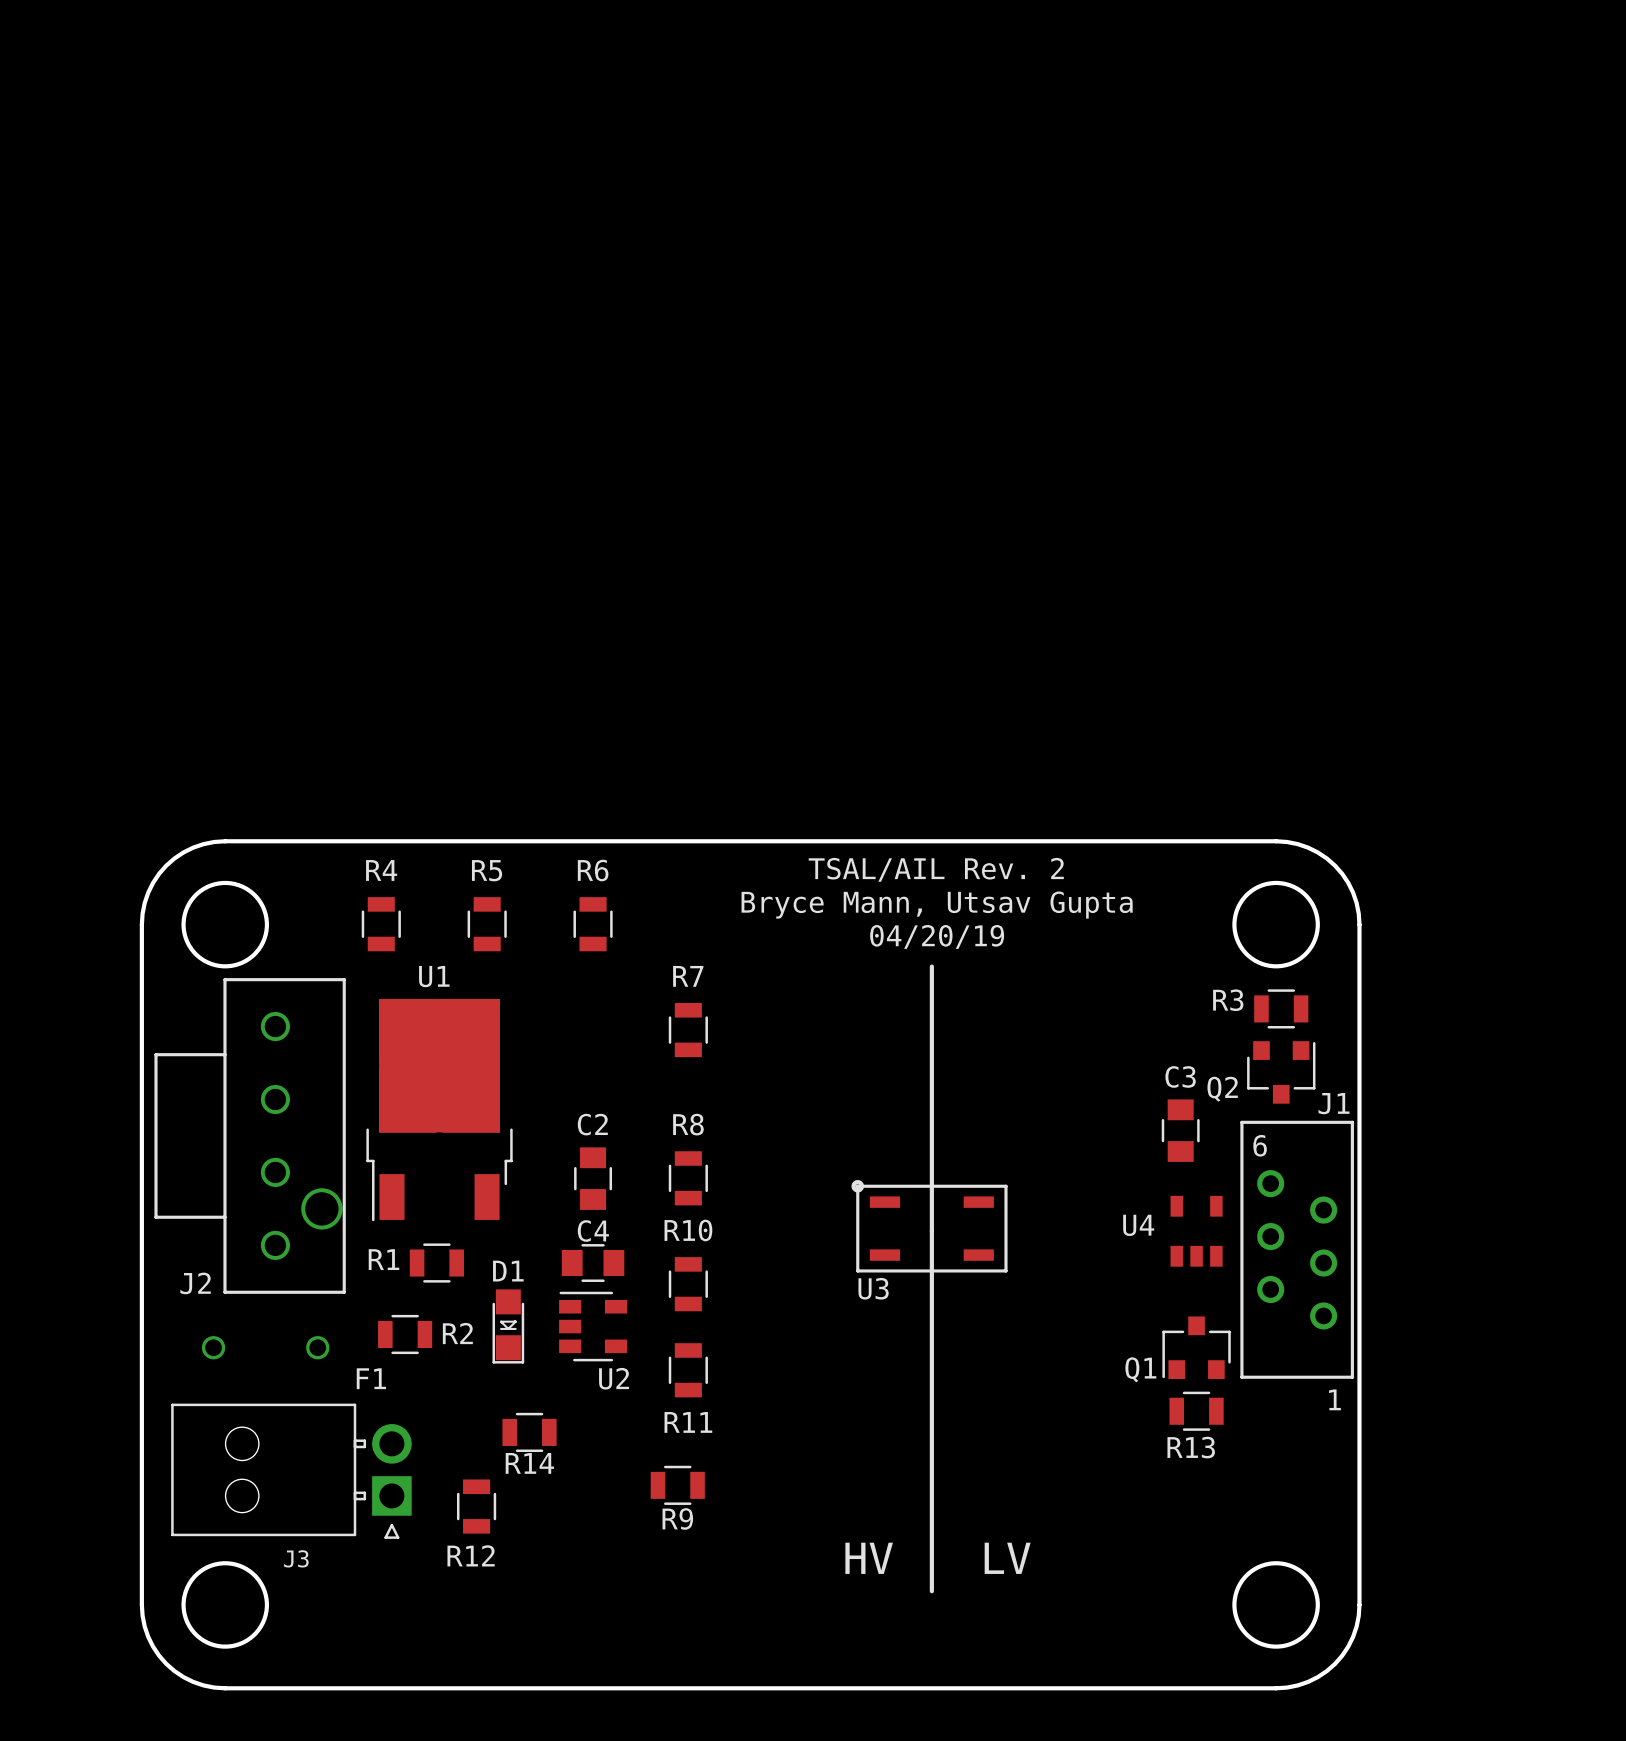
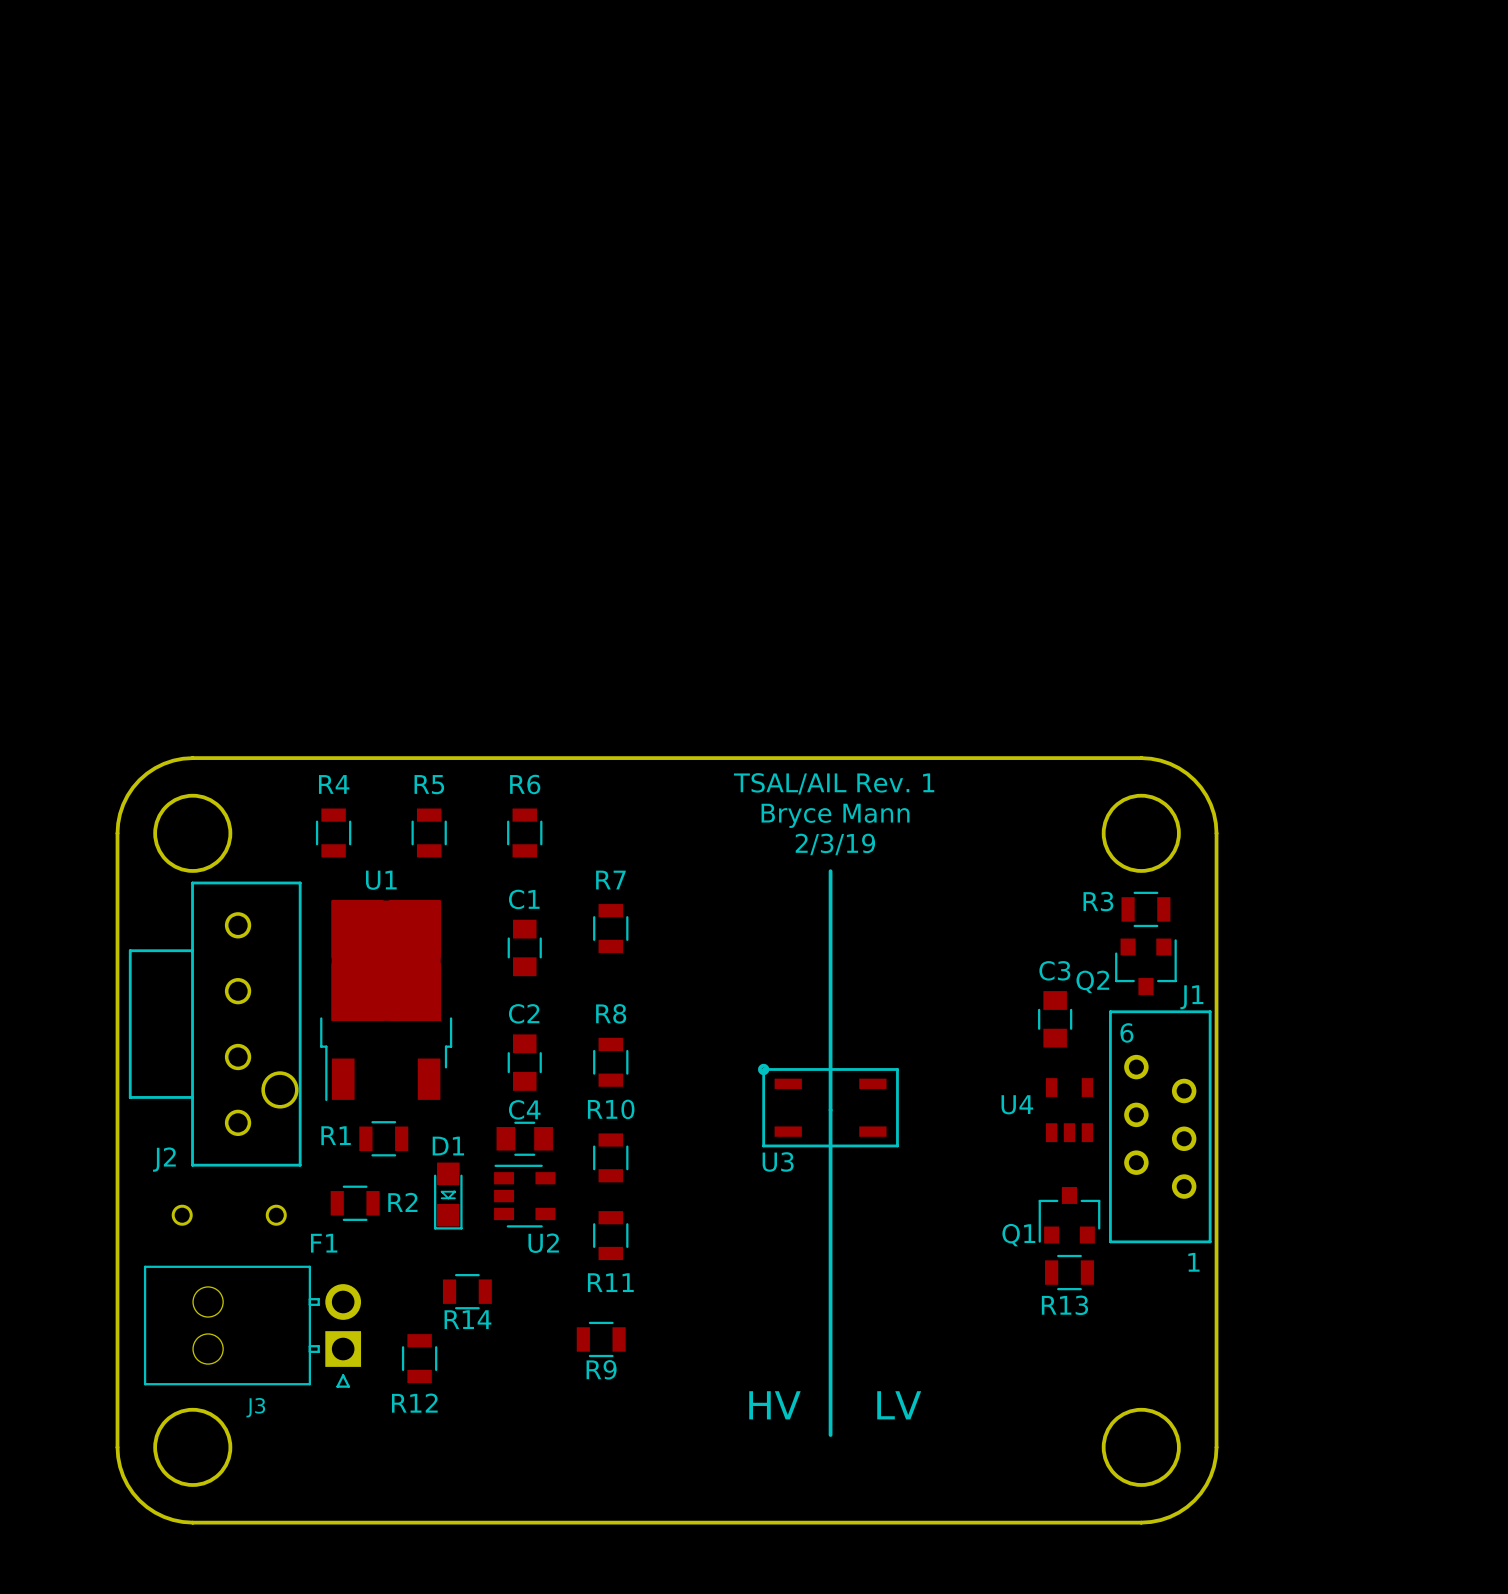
text: TSAL/AIL Rev. 2 (936, 869) -> TSAL/AIL Rev. 1 (834, 783)
text: Bryce Mann, Utsav Gupta (937, 905) -> Bryce Mann (835, 815)
text: 04/20/19 (937, 936) -> 2/3/19 (835, 844)
C1: none -> (524, 947)

